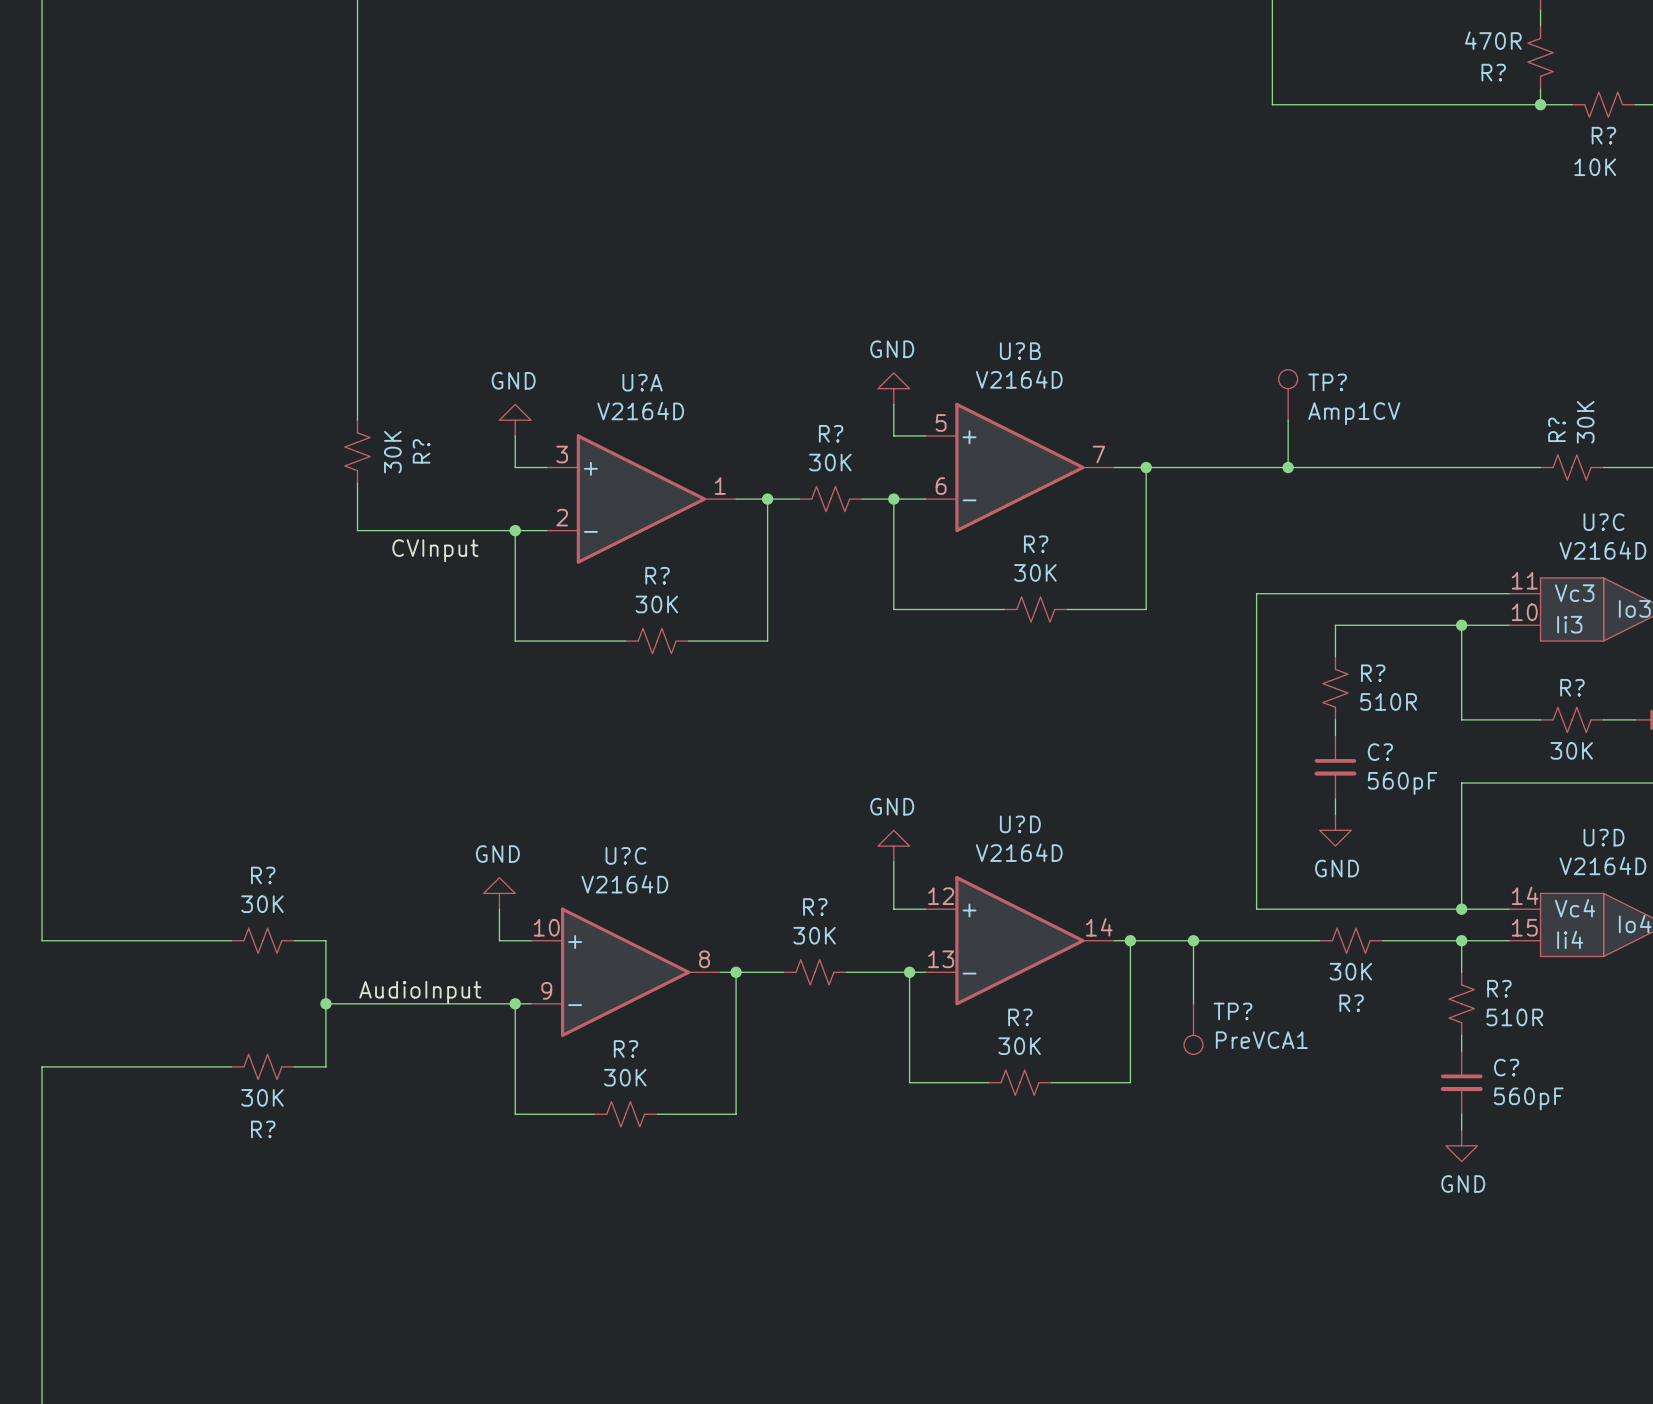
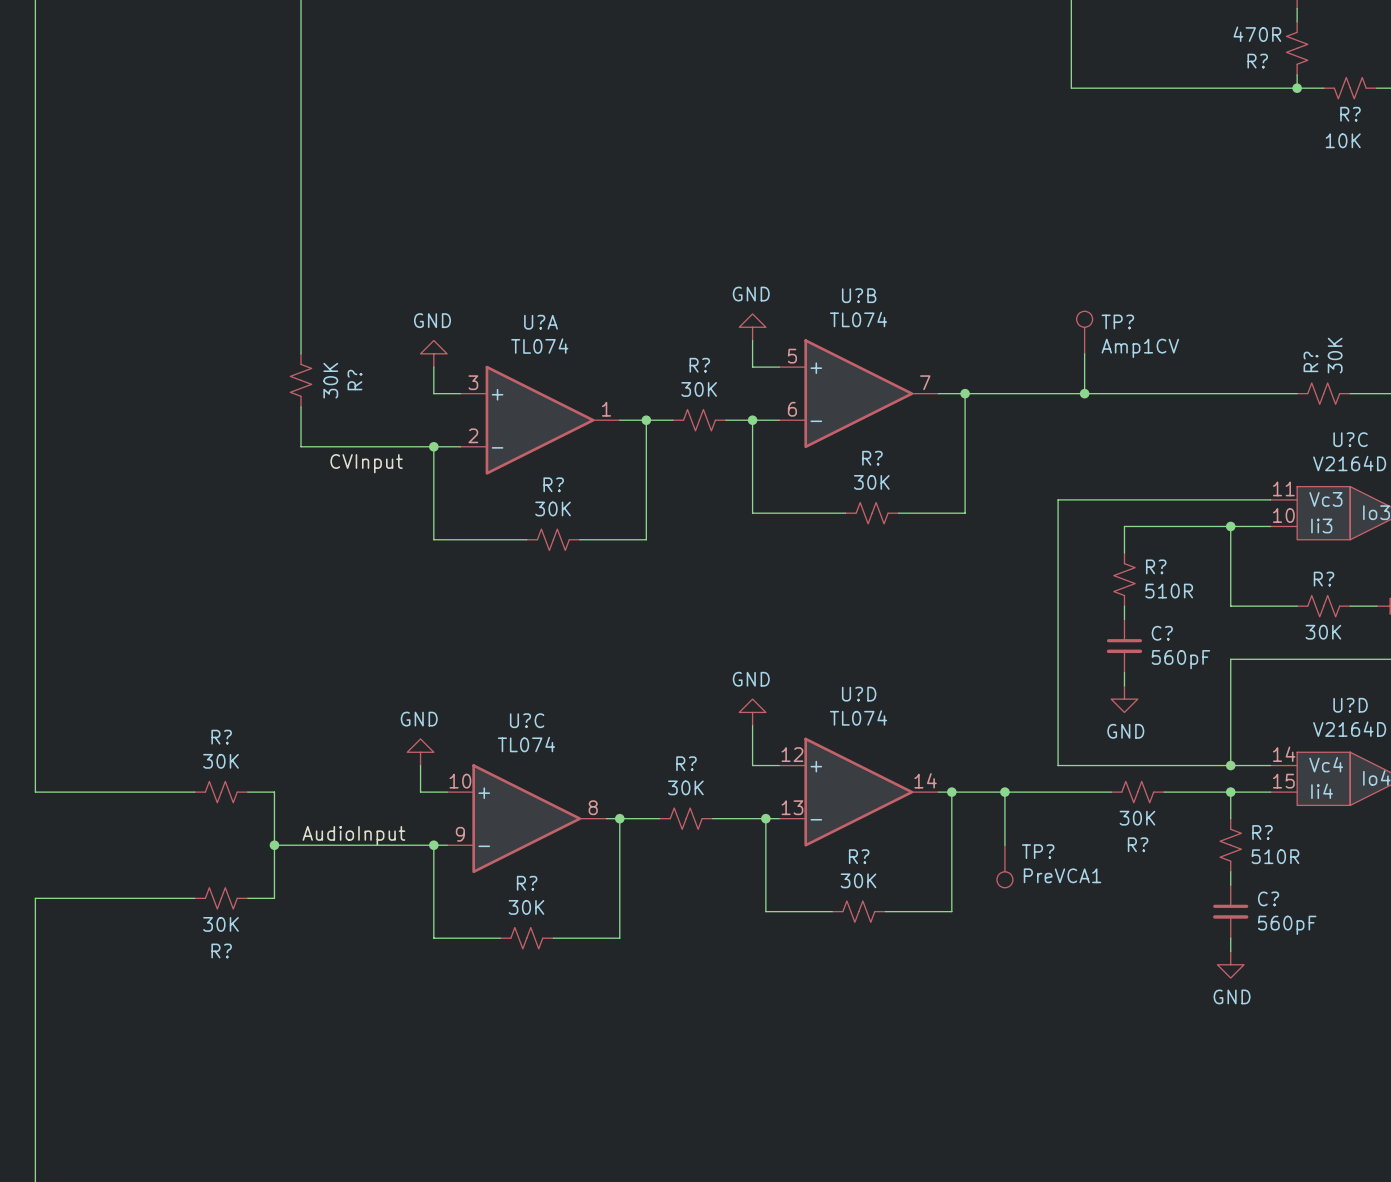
U?B value: V2164D (1019, 379) -> TL074 (858, 319)
U?A value: V2164D (640, 411) -> TL074 (539, 346)
U?D value: V2164D (1019, 852) -> TL074 (858, 717)
U?C value: V2164D (624, 884) -> TL074 (526, 744)

